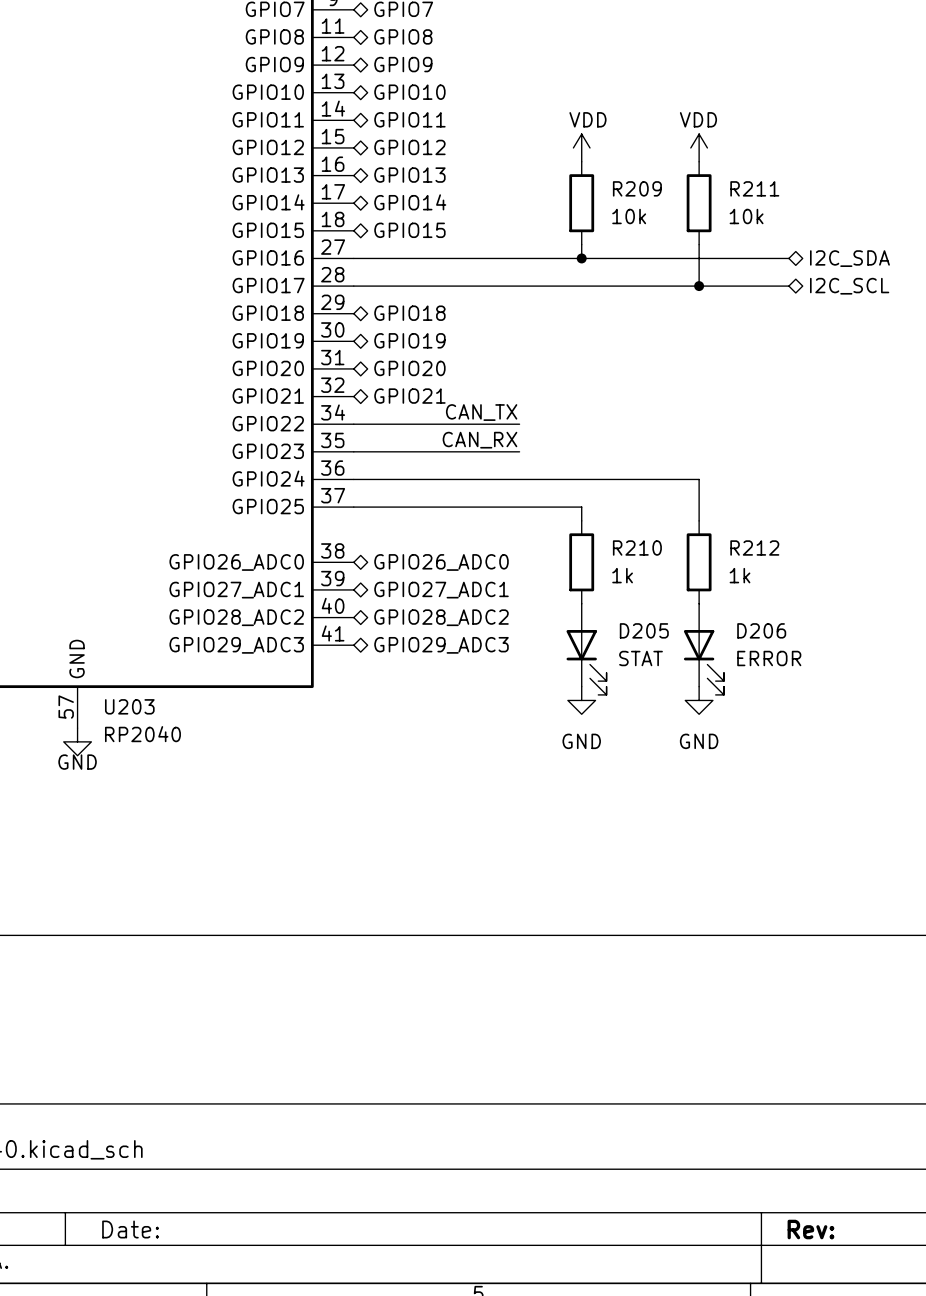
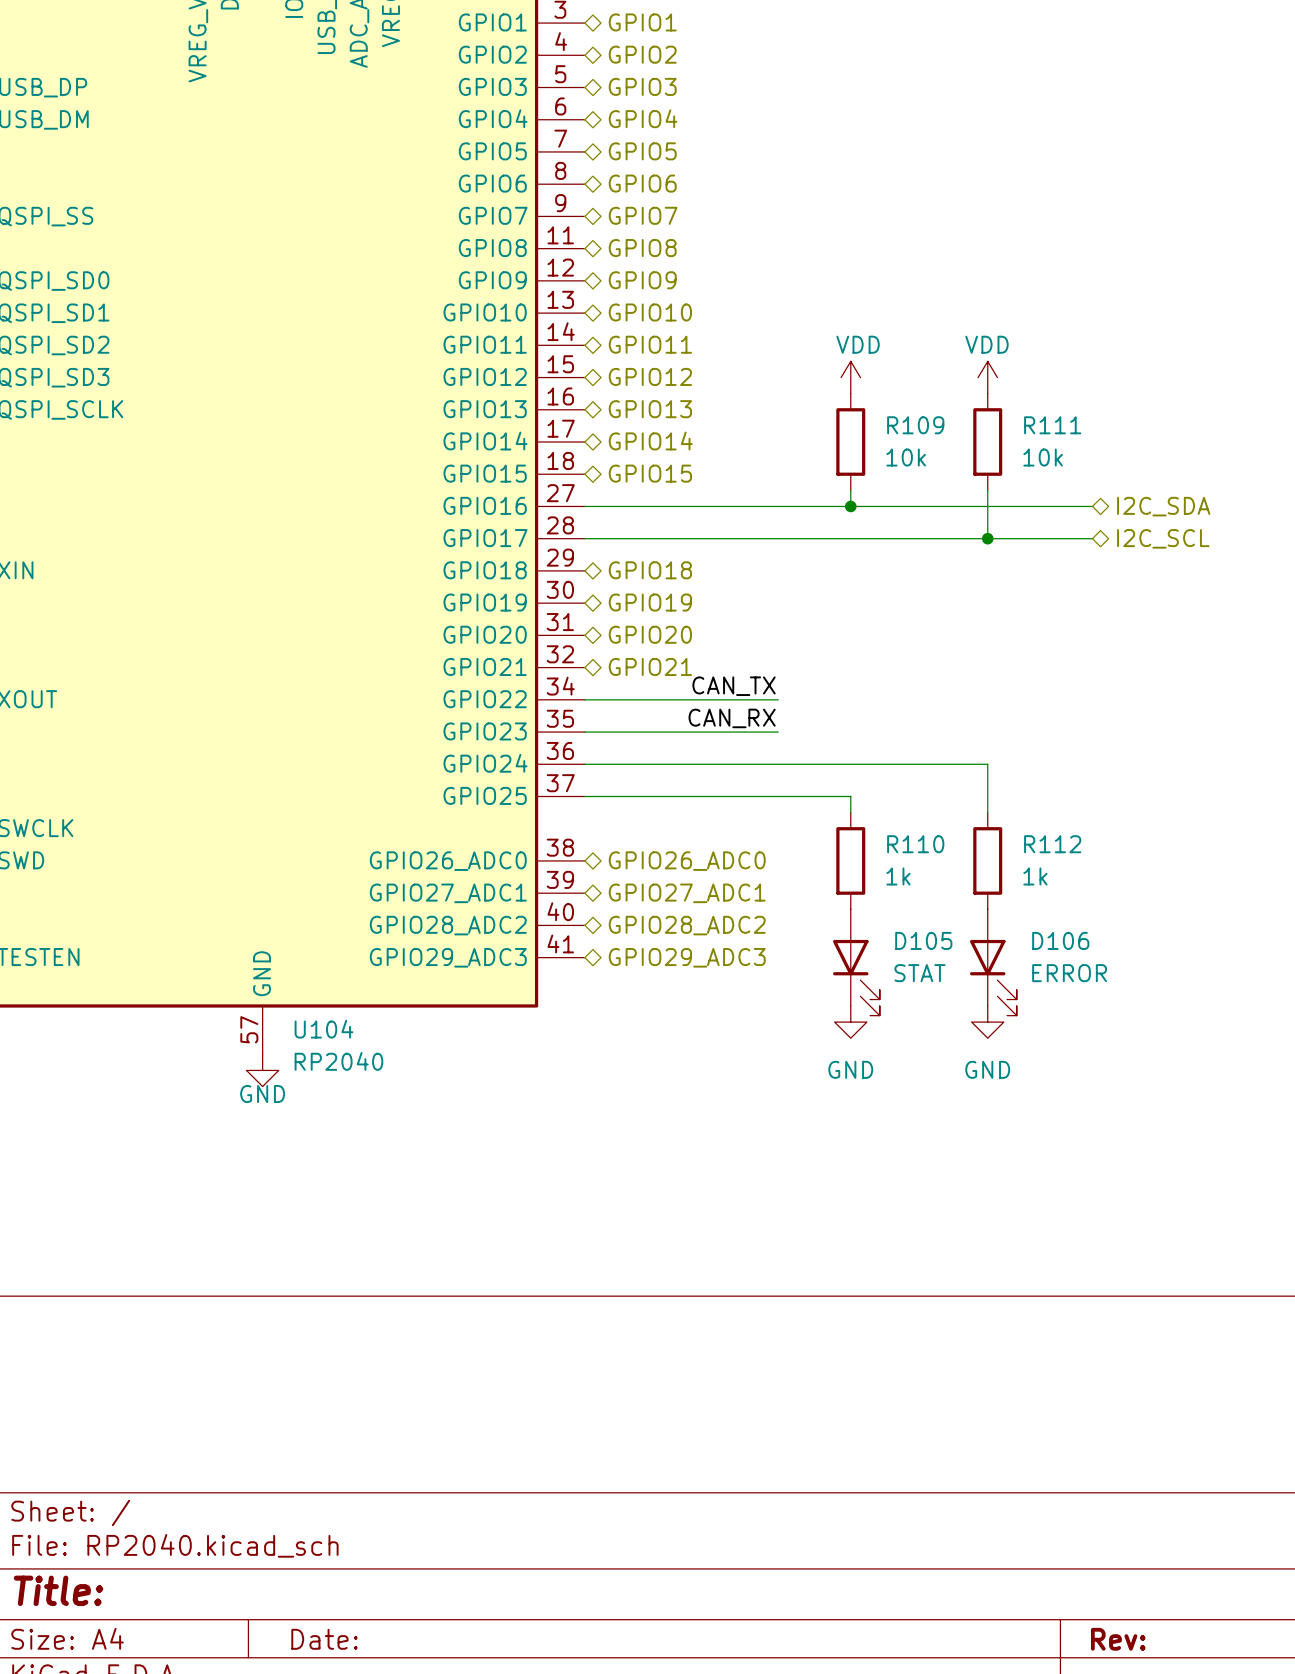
R209 name: R209 (637, 188) -> R109 (915, 425)
R211 name: R211 (754, 188) -> R111 (1052, 425)
R210 name: R210 (637, 548) -> R110 (915, 844)
R212 name: R212 (754, 548) -> R112 (1052, 844)
D205 name: D205 (644, 630) -> D105 (923, 940)
D206 name: D206 (761, 630) -> D106 (1060, 940)
U203 name: U203 (129, 706) -> U104 (323, 1029)

